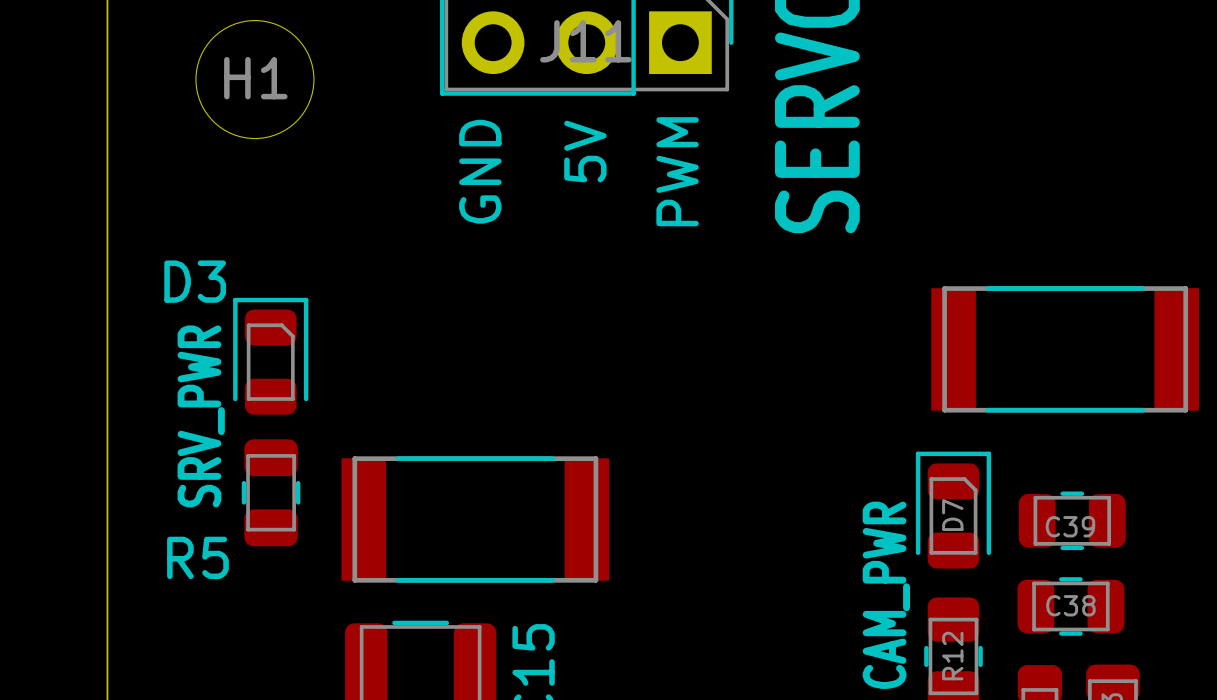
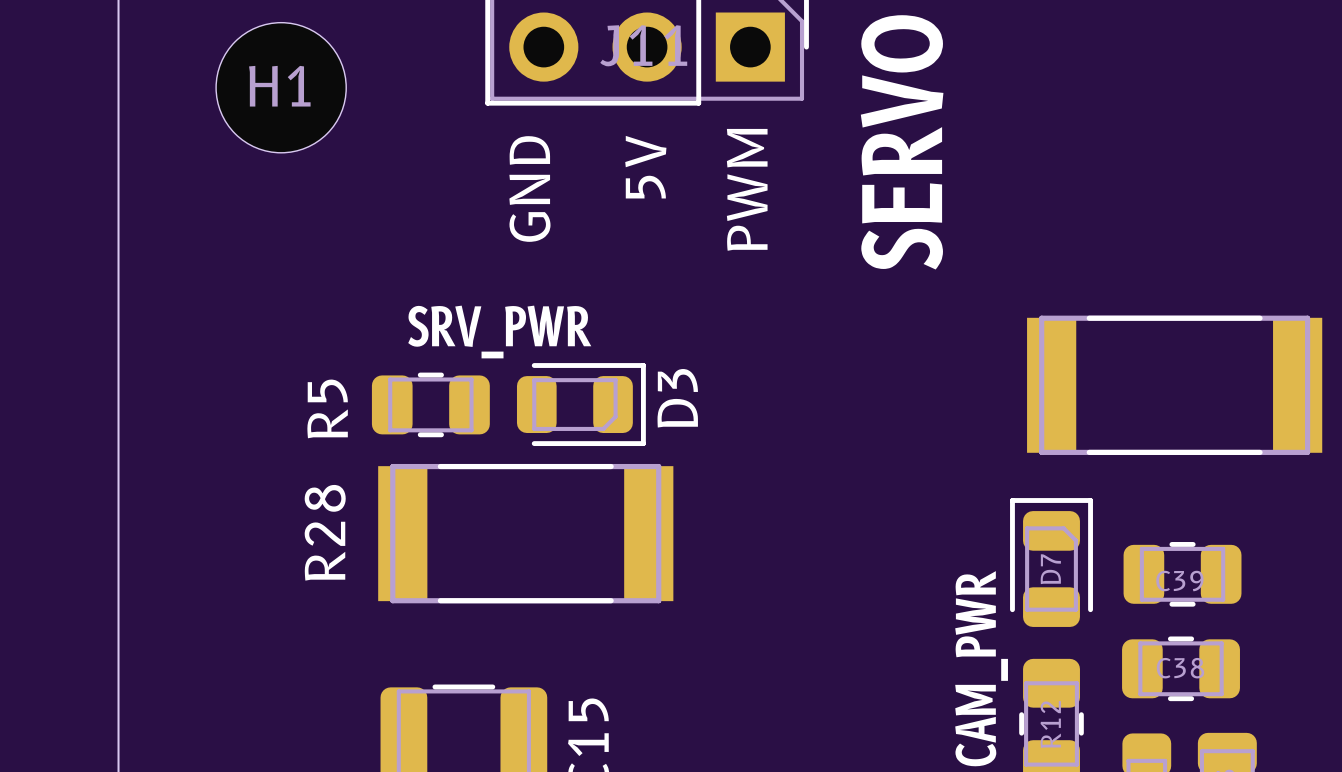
D3 rotation: 0° (270, 356) -> 90° clockwise (581, 404)
D3 position: (270, 356) -> (581, 404)
text rotation: 0° (201, 416) -> 90° clockwise (499, 332)
text position: SRV_PWR (201, 416) -> SRV_PWR (499, 332)
R28 name: none -> R28 (325, 532)
R5 rotation: 0° (271, 492) -> 90° clockwise (430, 404)
R5 position: (271, 492) -> (430, 404)
R28 position: (475, 519) -> (525, 533)

